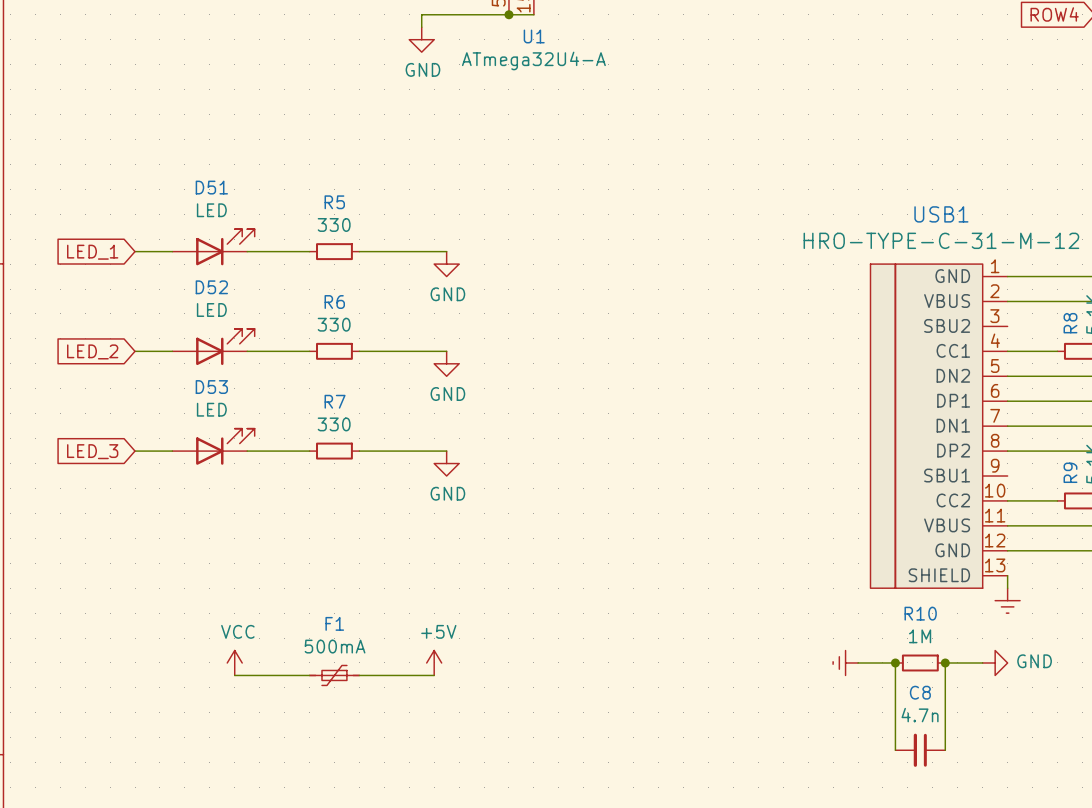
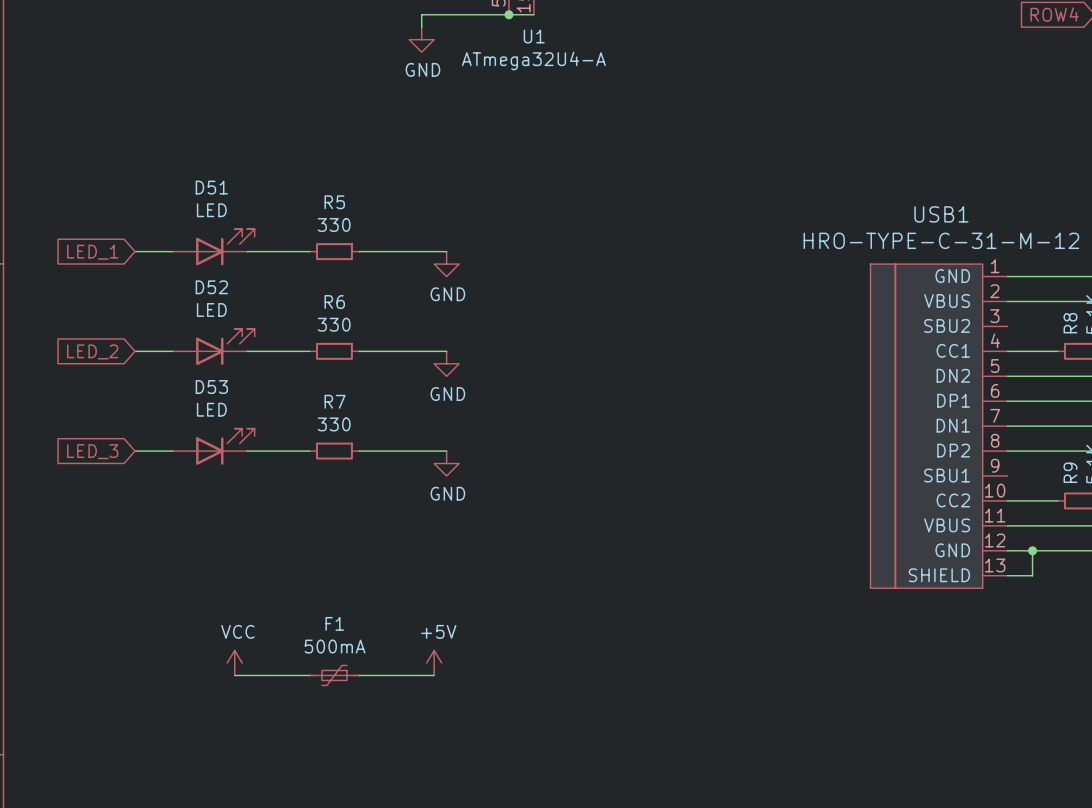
junction: none -> (1032, 550)
wire: (1007, 575) (1007, 588) -> (1007, 575) (1032, 575) (1032, 550)
power symbol: (1007, 600) -> none
power symbol: (845, 662) -> none
wire: (858, 662) (895, 662) (895, 750) -> none
junction: (895, 662) -> none
R10: 1M (920, 662) -> none
junction: (945, 662) -> none
wire: (982, 662) (945, 662) (945, 750) -> none
power symbol: GND (995, 662) -> none
C8: 4.7n (920, 750) -> none

